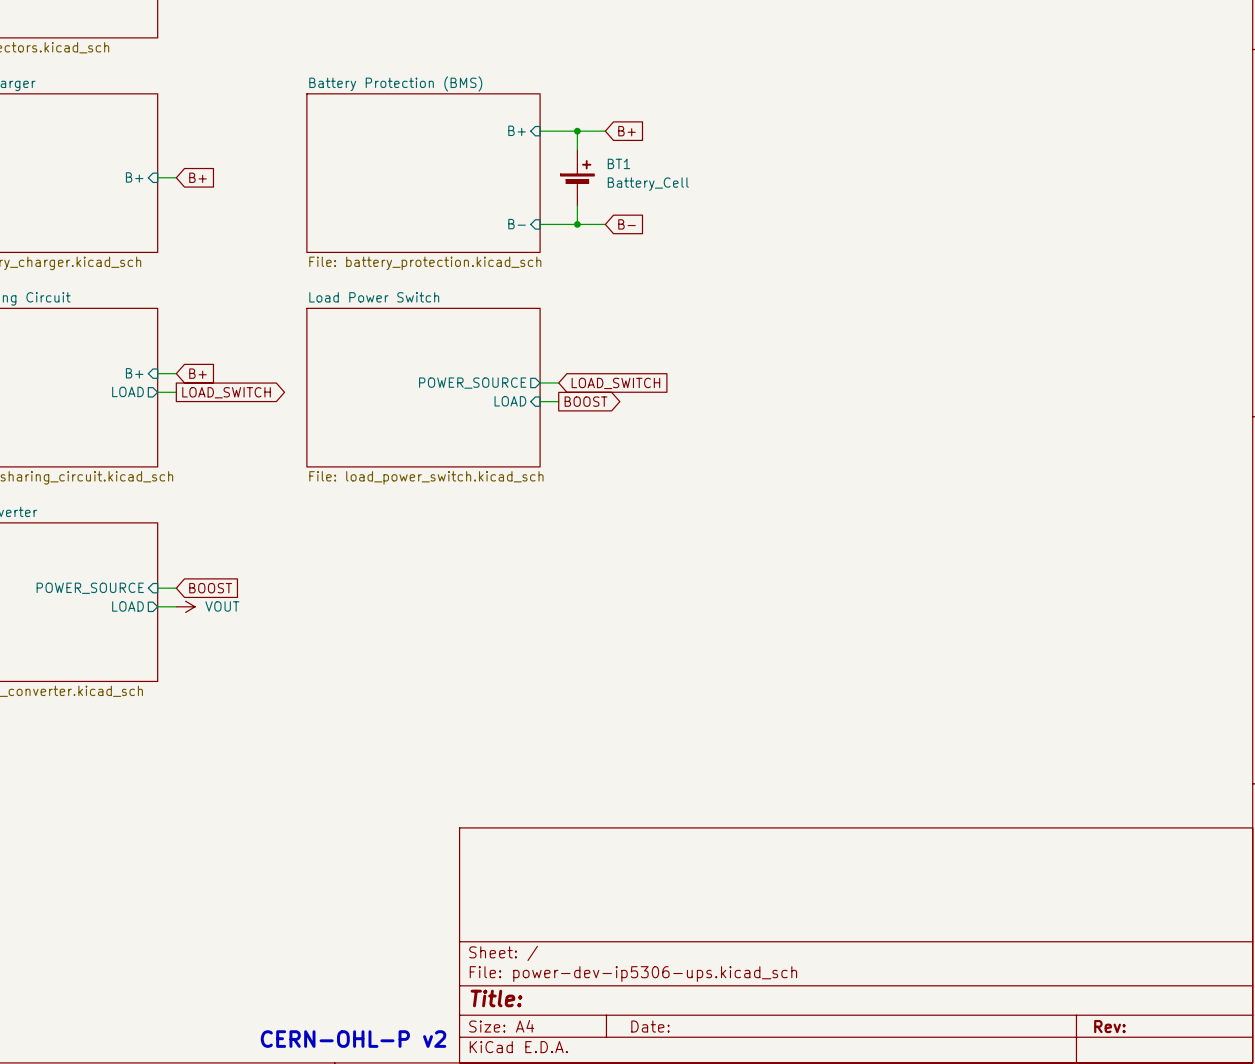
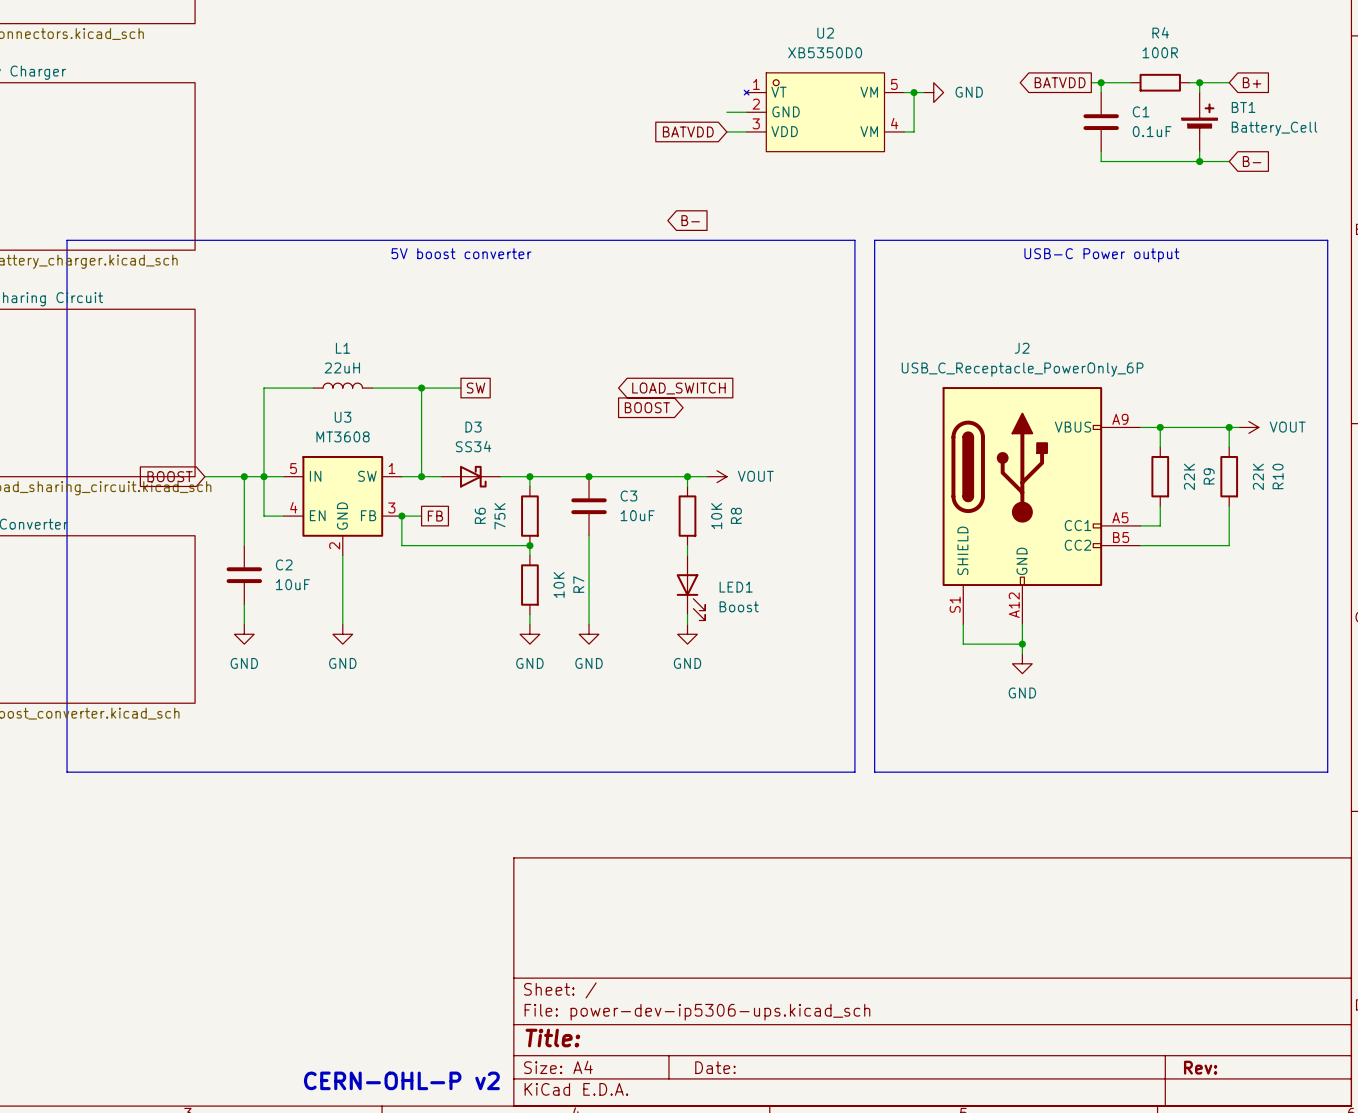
global label: none -> BATVDD (1060, 82)
wire: none -> (1091, 82) (1130, 82)
wire: none -> (1101, 82) (1101, 92)
junction: none -> (1101, 82)
R4: none -> 100R (1160, 82)
wire: none -> (1189, 82) (1229, 82)
wire: none -> (1199, 82) (1199, 92)
junction: none -> (1199, 82)
global label: none -> B+ (1252, 82)
wire: none -> (904, 92) (923, 92)
wire: none -> (914, 92) (914, 131) (904, 131)
junction: none -> (914, 92)
power symbol: none -> GND (933, 92)
wire: none -> (726, 112) (746, 112)
U2: none -> XB5350D0 (824, 112)
sheet pin: B+ (517, 130) -> none
wire: (540, 131) (605, 131) -> none
wire: (577, 131) (577, 149) -> none
junction: (577, 131) -> none
global label: B+ (627, 131) -> none
C1: none -> 0.1uF (1101, 122)
global label: none -> BATVDD (688, 131)
wire: none -> (726, 131) (746, 131)
wire: none -> (1101, 151) (1101, 161) (1229, 161)
wire: none -> (1199, 151) (1199, 161)
junction: none -> (1199, 161)
global label: none -> B- (1252, 161)
sheet Battery Protection (BMS): File: battery_protection.kicad_sch (423, 173) -> none
sheet pin: B+ (134, 177) -> none
wire: (157, 177) (176, 177) -> none
global label: B+ (197, 177) -> none
BT1 position: (577, 177) -> (1199, 122)
wire: (577, 205) (577, 224) -> none
sheet pin: B- (517, 224) -> none
wire: (540, 224) (605, 224) -> none
junction: (577, 224) -> none
line: none -> (67, 240) (854, 240) (854, 772) (67, 772) (67, 240)
line: none -> (874, 240) (1327, 240) (1327, 772) (874, 772) (874, 240)
text: none -> 5V boost converter (461, 253)
text: none -> USB-C Power output (1101, 255)
sheet pin: B+ (134, 373) -> none
wire: (157, 373) (176, 373) -> none
global label: B+ (197, 373) -> none
L1: none -> 22uH (342, 385)
wire: none -> (313, 388) (264, 388) (264, 516) (283, 516)
wire: none -> (372, 388) (460, 388)
wire: none -> (421, 388) (421, 476)
junction: none -> (421, 388)
global label: none -> SW (476, 388)
wire: (540, 382) (558, 382) -> none
sheet pin: POWER_SOURCE (472, 383) -> none
sheet Load Power Switch: File: load_power_switch.kicad_sch (423, 387) -> none
sheet pin: LOAD (127, 391) -> none
wire: (157, 392) (176, 392) -> none
global label: LOAD_SWITCH (226, 392) -> none
sheet pin: LOAD (510, 401) -> none
wire: (540, 401) (558, 401) -> none
wire: none -> (1140, 427) (1239, 427)
wire: none -> (1160, 427) (1160, 447)
junction: none -> (1160, 427)
wire: none -> (1229, 427) (1229, 447)
junction: none -> (1229, 427)
power symbol: none -> VOUT (1248, 427)
wire: none -> (204, 476) (283, 476)
wire: none -> (244, 476) (244, 545)
junction: none -> (244, 476)
junction: none -> (264, 476)
junction: none -> (421, 476)
D3: none -> SS34 (470, 476)
wire: none -> (500, 476) (707, 476)
wire: none -> (529, 476) (529, 486)
junction: none -> (529, 476)
junction: none -> (589, 476)
wire: none -> (687, 476) (687, 486)
junction: none -> (687, 476)
power symbol: none -> VOUT (717, 476)
R9: none -> 22K (1160, 476)
R10: none -> 22K (1229, 476)
U3: none -> MT3608 (342, 505)
C3: none -> 10uF (589, 506)
J2: none -> USB_C_Receptacle_PowerOnly_6P (1041, 505)
wire: none -> (1160, 506) (1160, 525) (1140, 525)
wire: none -> (1229, 506) (1229, 545) (1140, 545)
junction: none -> (401, 516)
wire: none -> (421, 516) (401, 516) (401, 545) (529, 545) (529, 555)
global label: none -> FB (435, 516)
R6: none -> 75K (529, 516)
R8: none -> 10K (687, 516)
wire: none -> (589, 535) (589, 624)
junction: none -> (529, 545)
wire: none -> (687, 545) (687, 555)
wire: none -> (342, 555) (342, 624)
C2: none -> 10uF (244, 575)
R7: none -> 10K (529, 585)
LED1: none -> Boost (690, 587)
sheet pin: POWER_SOURCE (90, 588) -> none
wire: (157, 588) (176, 588) -> none
wire: none -> (244, 604) (244, 624)
global label rotation: 0° (210, 588) -> 180° (170, 476)
global label position: BOOST (210, 588) -> BOOST (170, 476)
wire: none -> (529, 614) (529, 624)
wire: none -> (687, 614) (687, 624)
sheet pin: LOAD (127, 606) -> none
wire: (157, 606) (176, 606) -> none
power symbol: VOUT (185, 606) -> none
wire: none -> (963, 624) (963, 644) (1022, 644)
wire: none -> (1022, 624) (1022, 653)
power symbol: none -> GND (244, 634)
power symbol: none -> GND (342, 634)
power symbol: none -> GND (529, 634)
power symbol: none -> GND (589, 634)
power symbol: none -> GND (687, 634)
junction: none -> (1022, 644)
power symbol: none -> GND (1022, 663)

